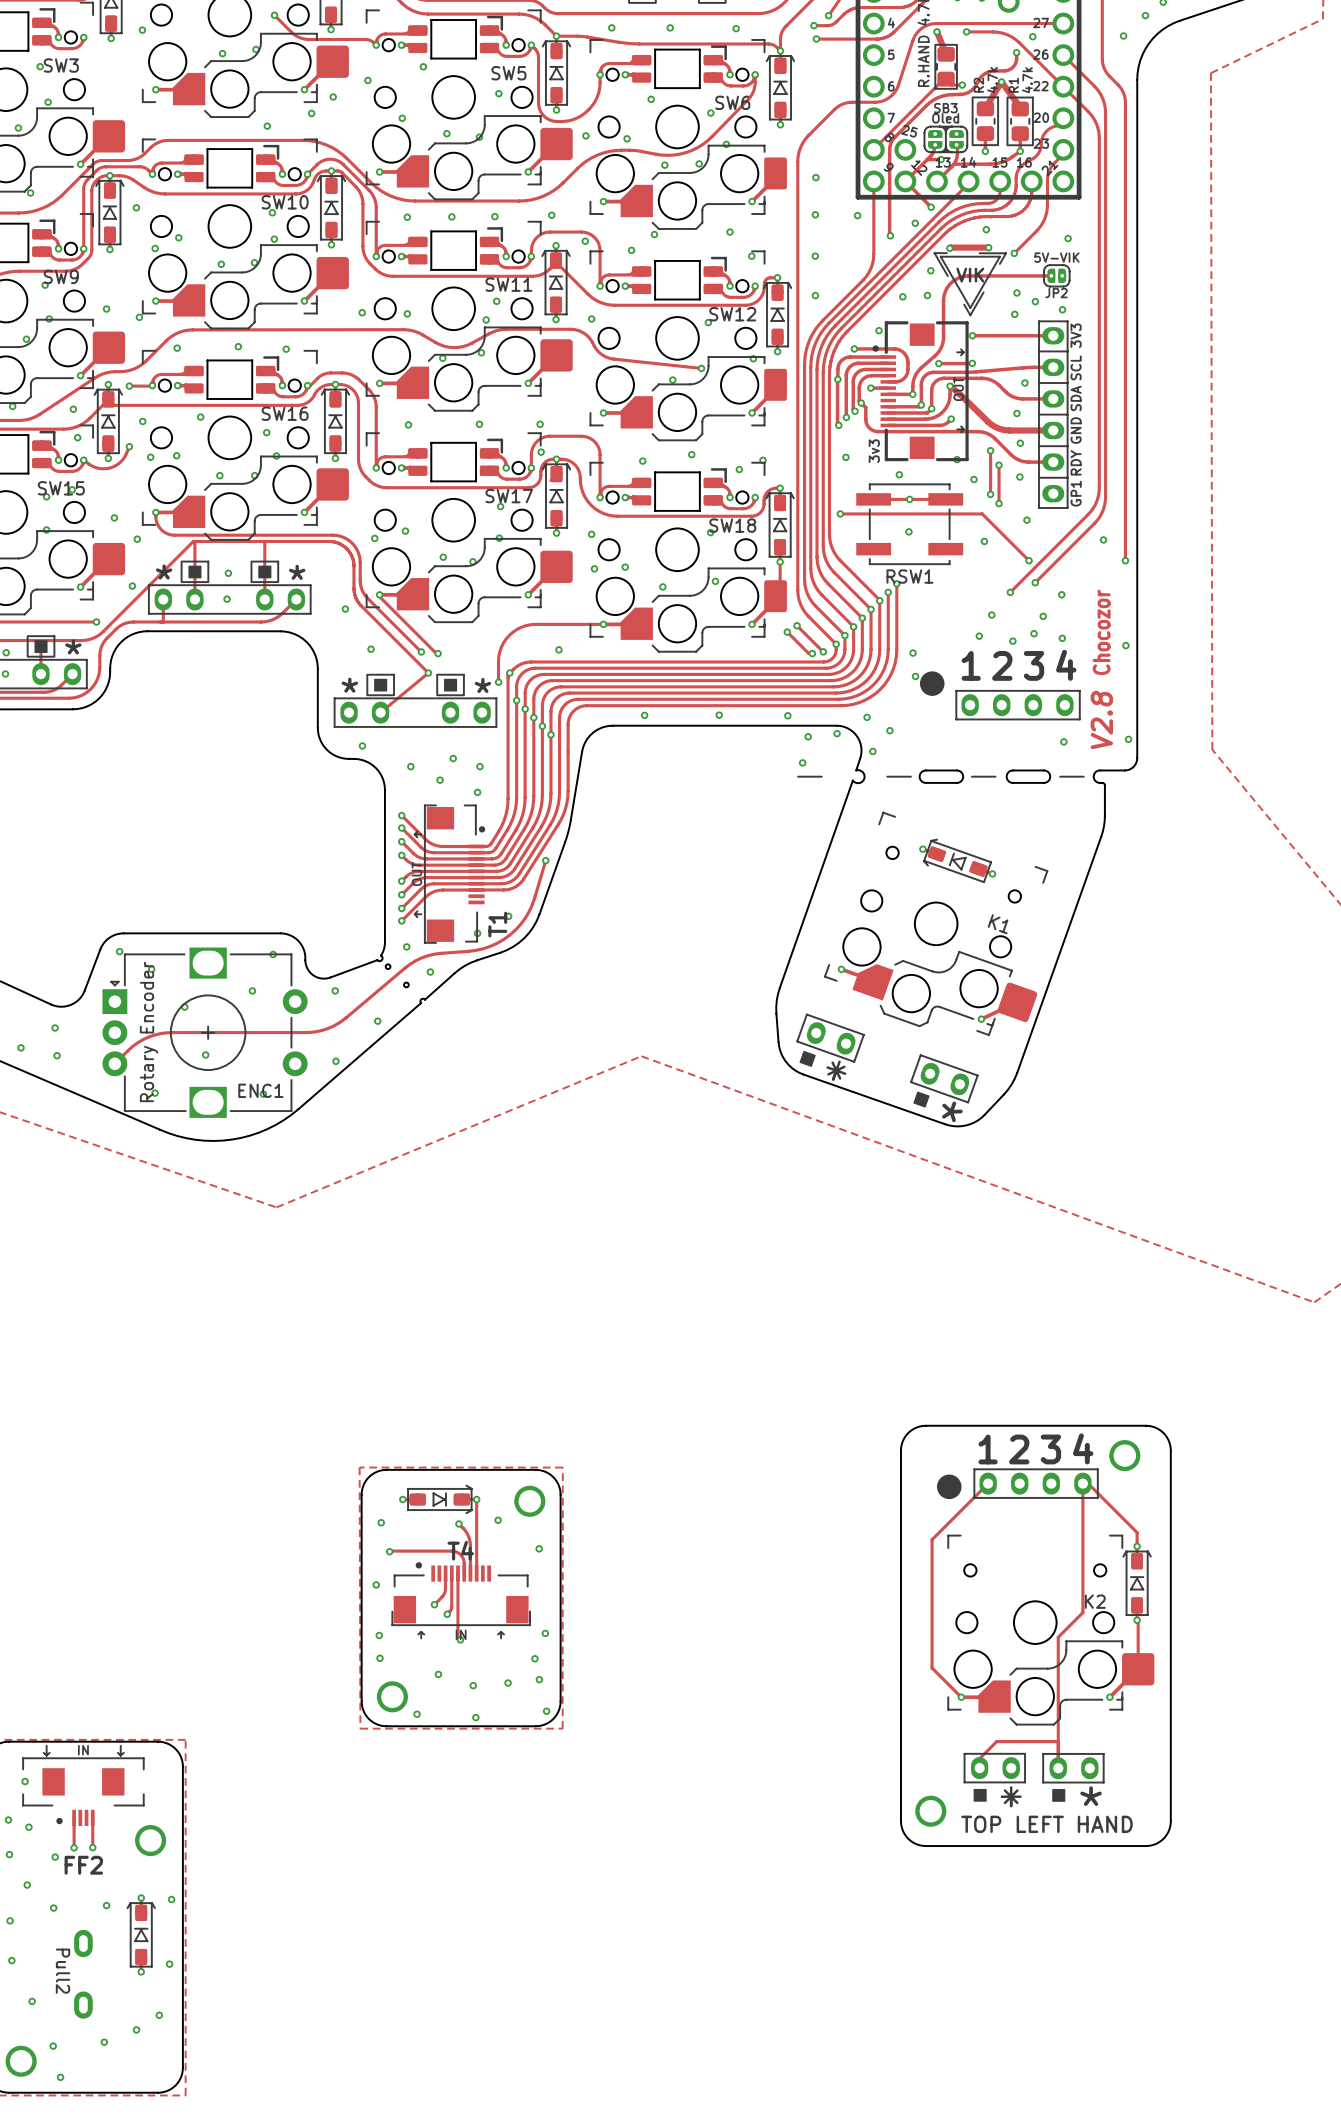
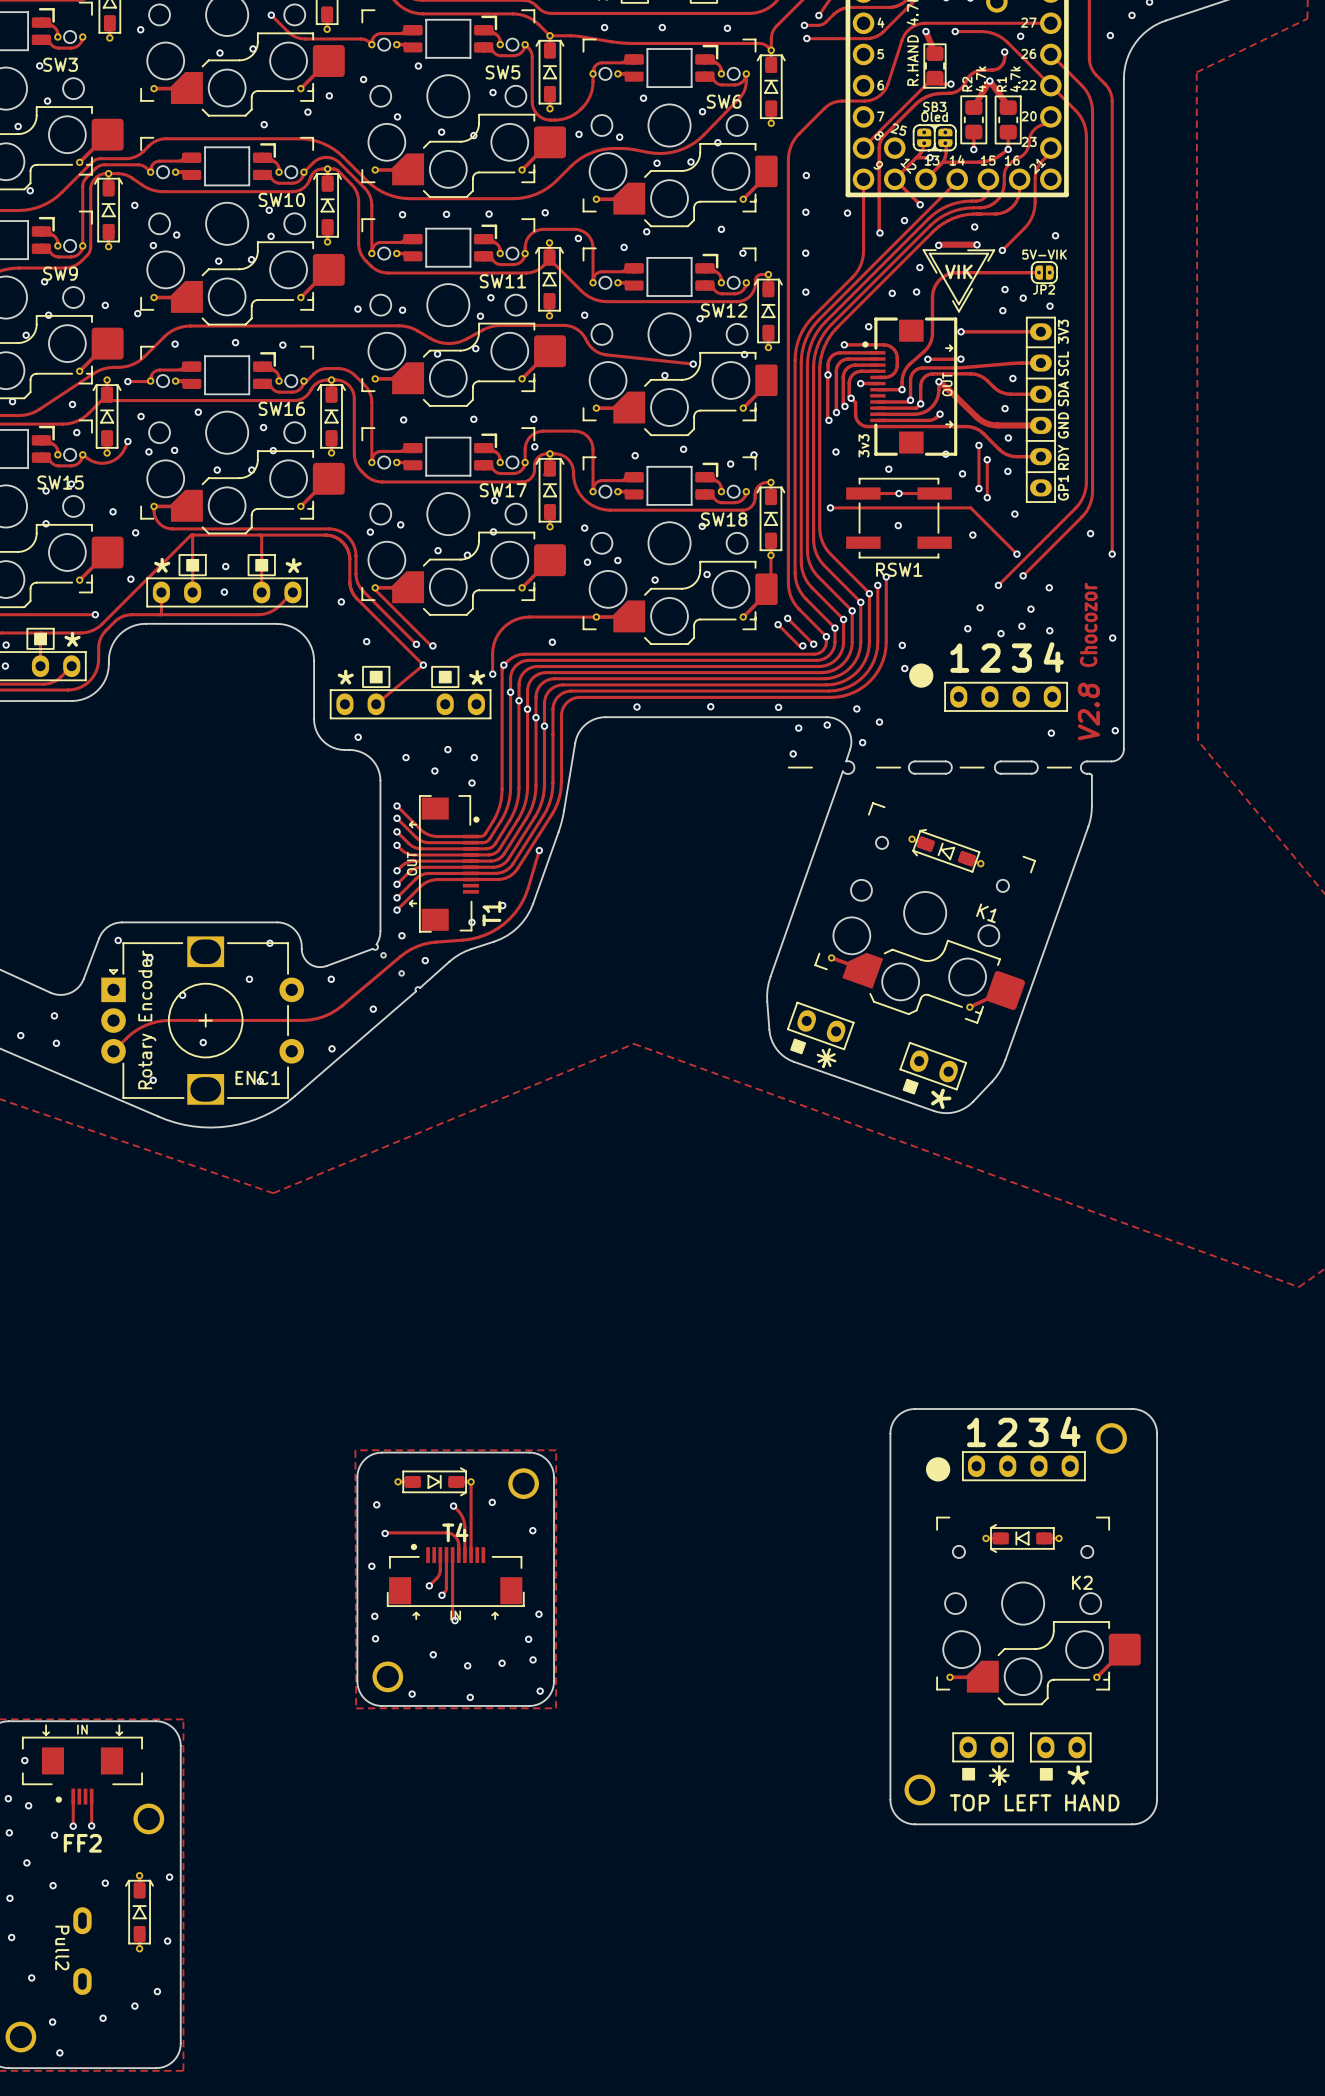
K2 footprint: [936, 1468, 1155, 1808] -> [925, 1451, 1141, 1787]
track: (988, 1483) (932, 1539) (932, 1668) (961, 1697) -> none
track: (1137, 1546) (1137, 1532) (1088, 1483) (1082, 1483) (1082, 1612) (1058, 1637) (1058, 1768) -> none
track: (1137, 1620) (1138, 1669) -> none
track: (1058, 1741) (996, 1741) (979, 1758) (979, 1768) -> none

